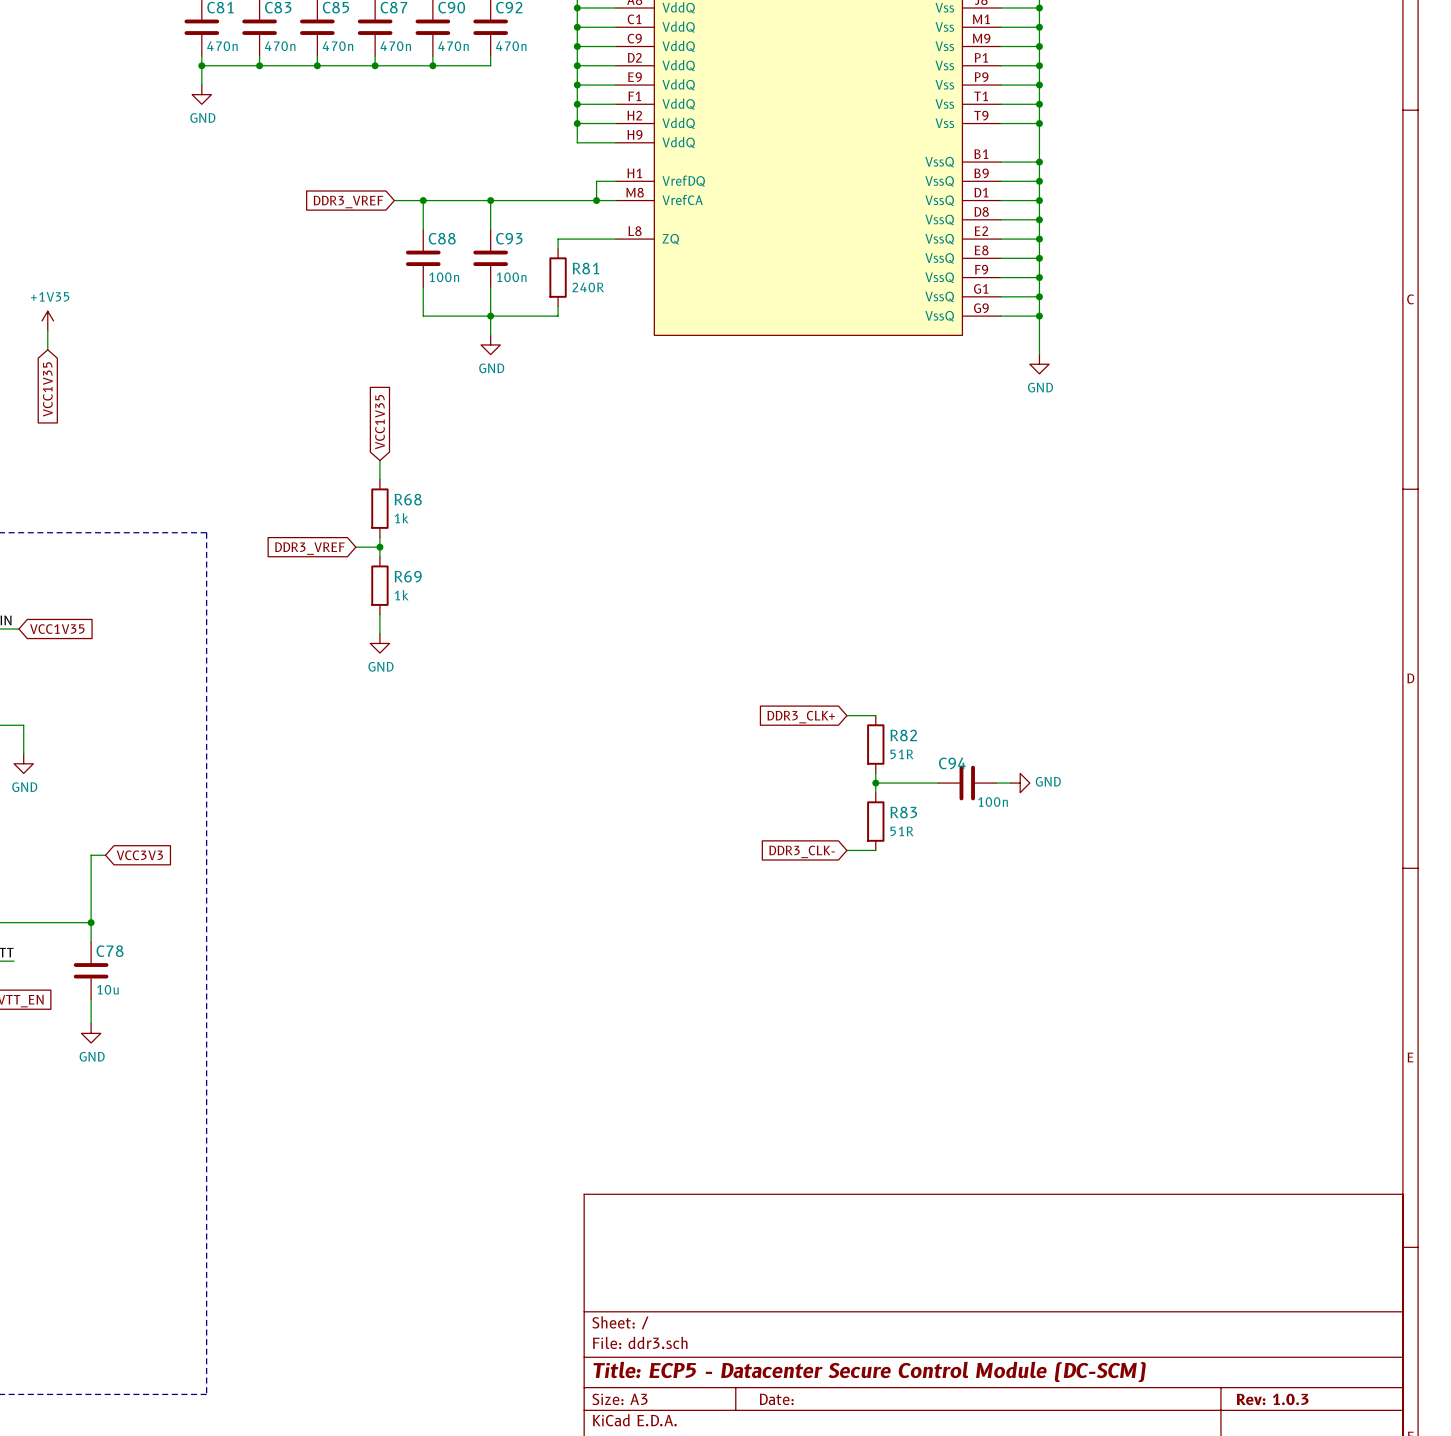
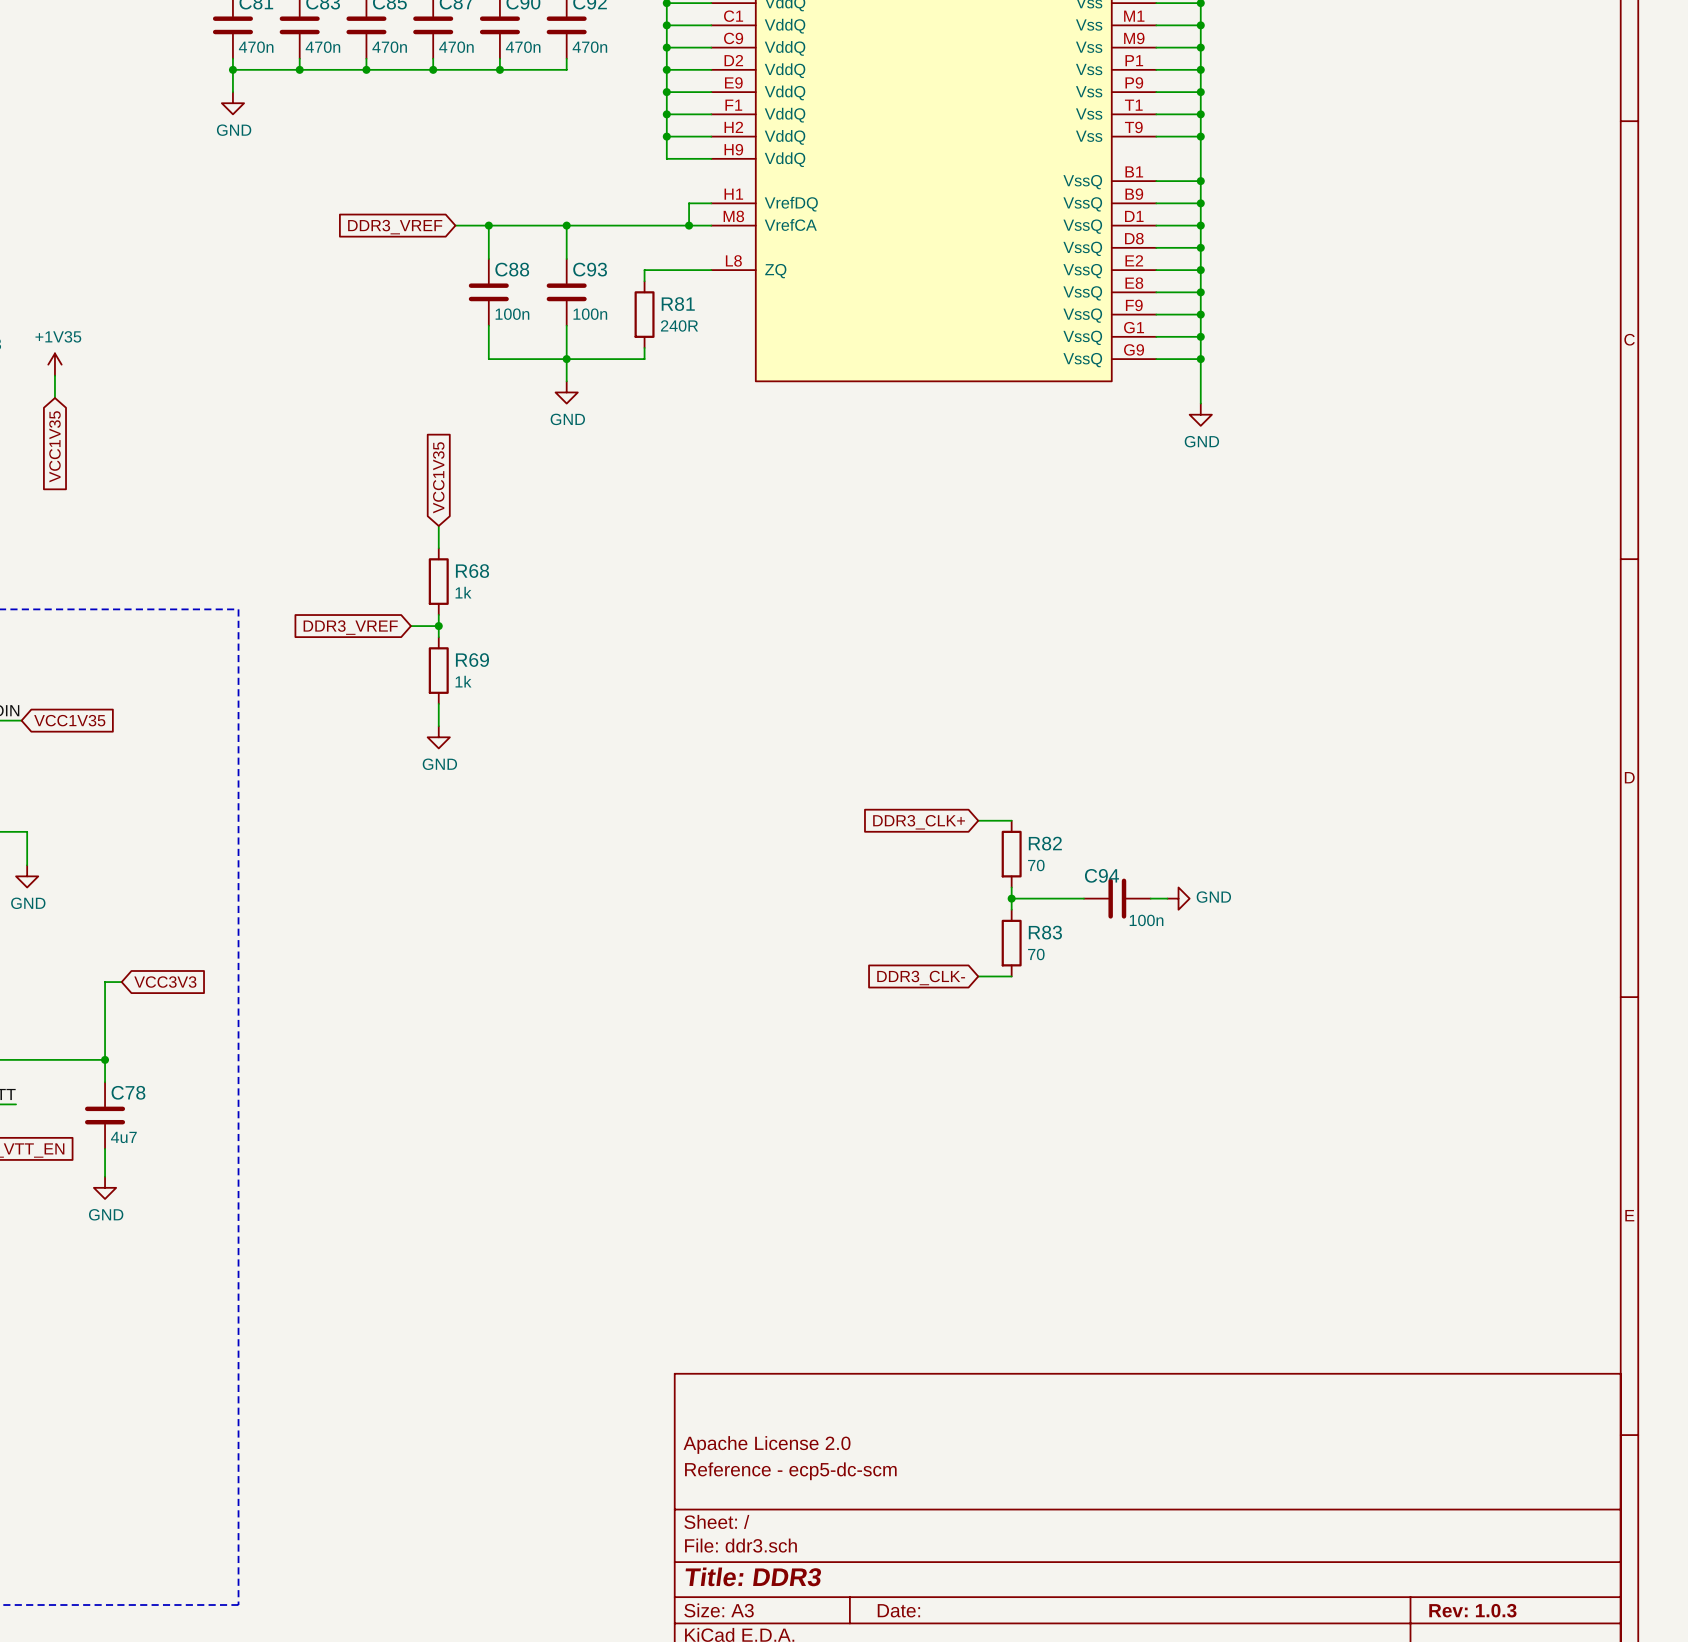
R82 text: 51R (902, 754) -> 70 (1036, 865)
R83 text: 51R (902, 831) -> 70 (1036, 954)
C78 text: 10u (107, 989) -> 4u7 (123, 1137)
title block: none -> Apache License 2.0 (767, 1444)
title block: none -> Reference - ecp5-dc-scm (790, 1471)
title block: Title: ECP5 - Datacenter Secure Control Module (DC-SCM) (869, 1371) -> Title: DDR3 (753, 1576)

